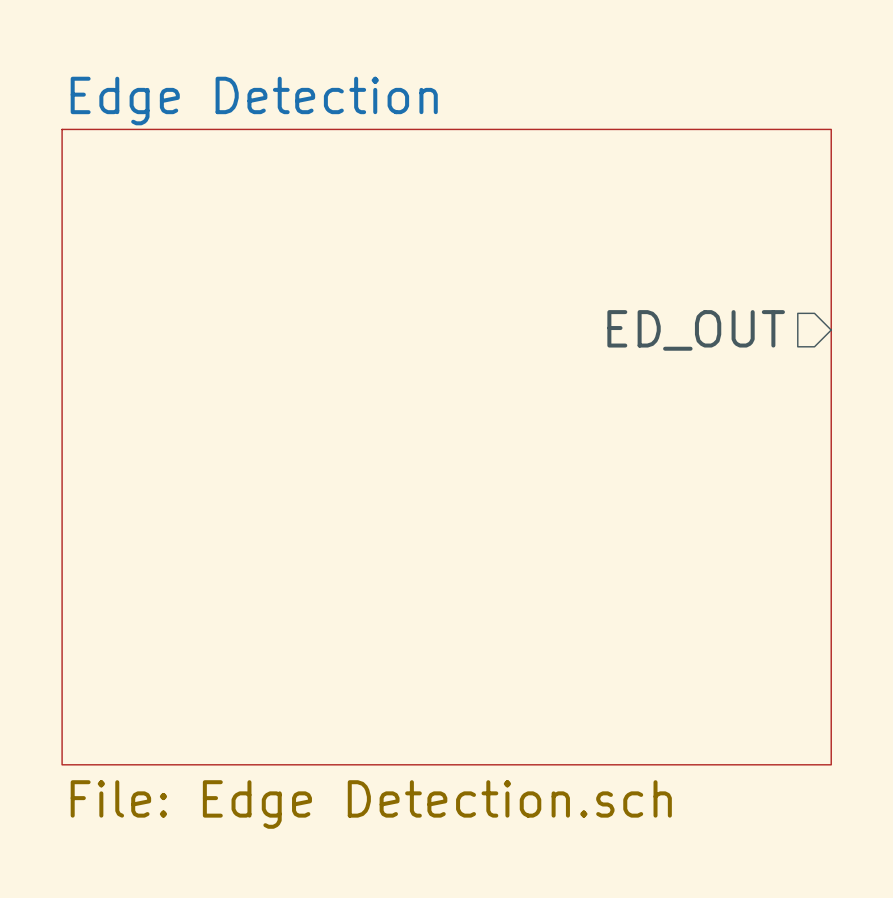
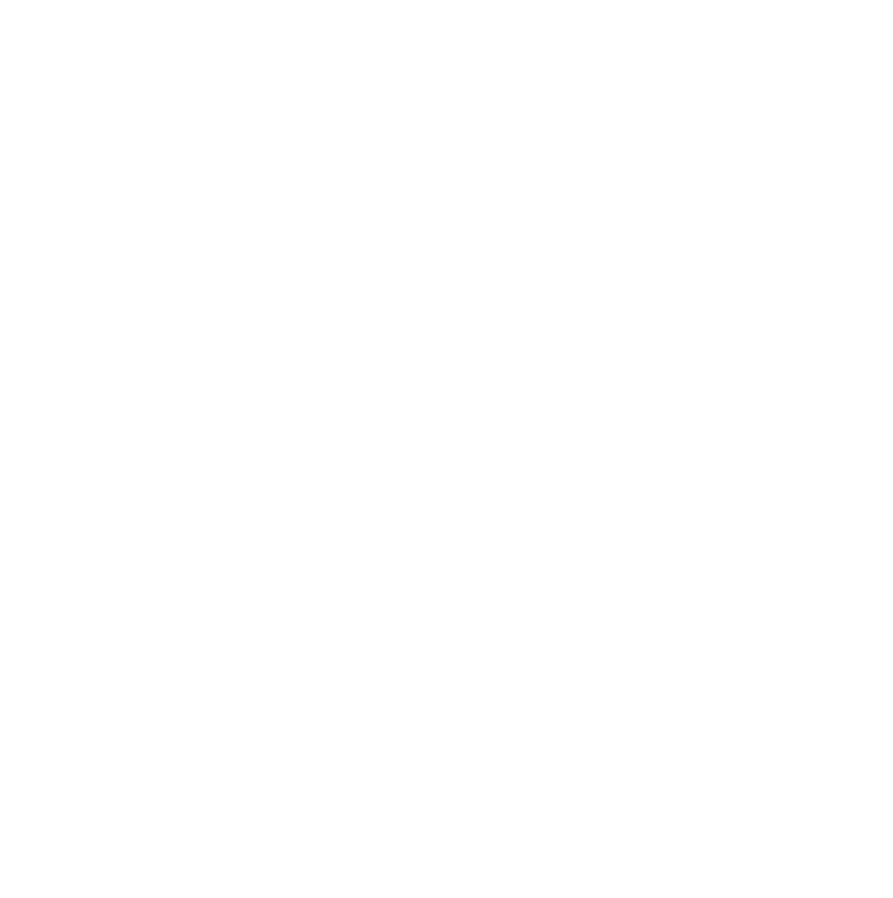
sheet pin: ED_OUT (696, 330) -> none
sheet Edge Detection: File: Edge Detection.sch (446, 447) -> none

